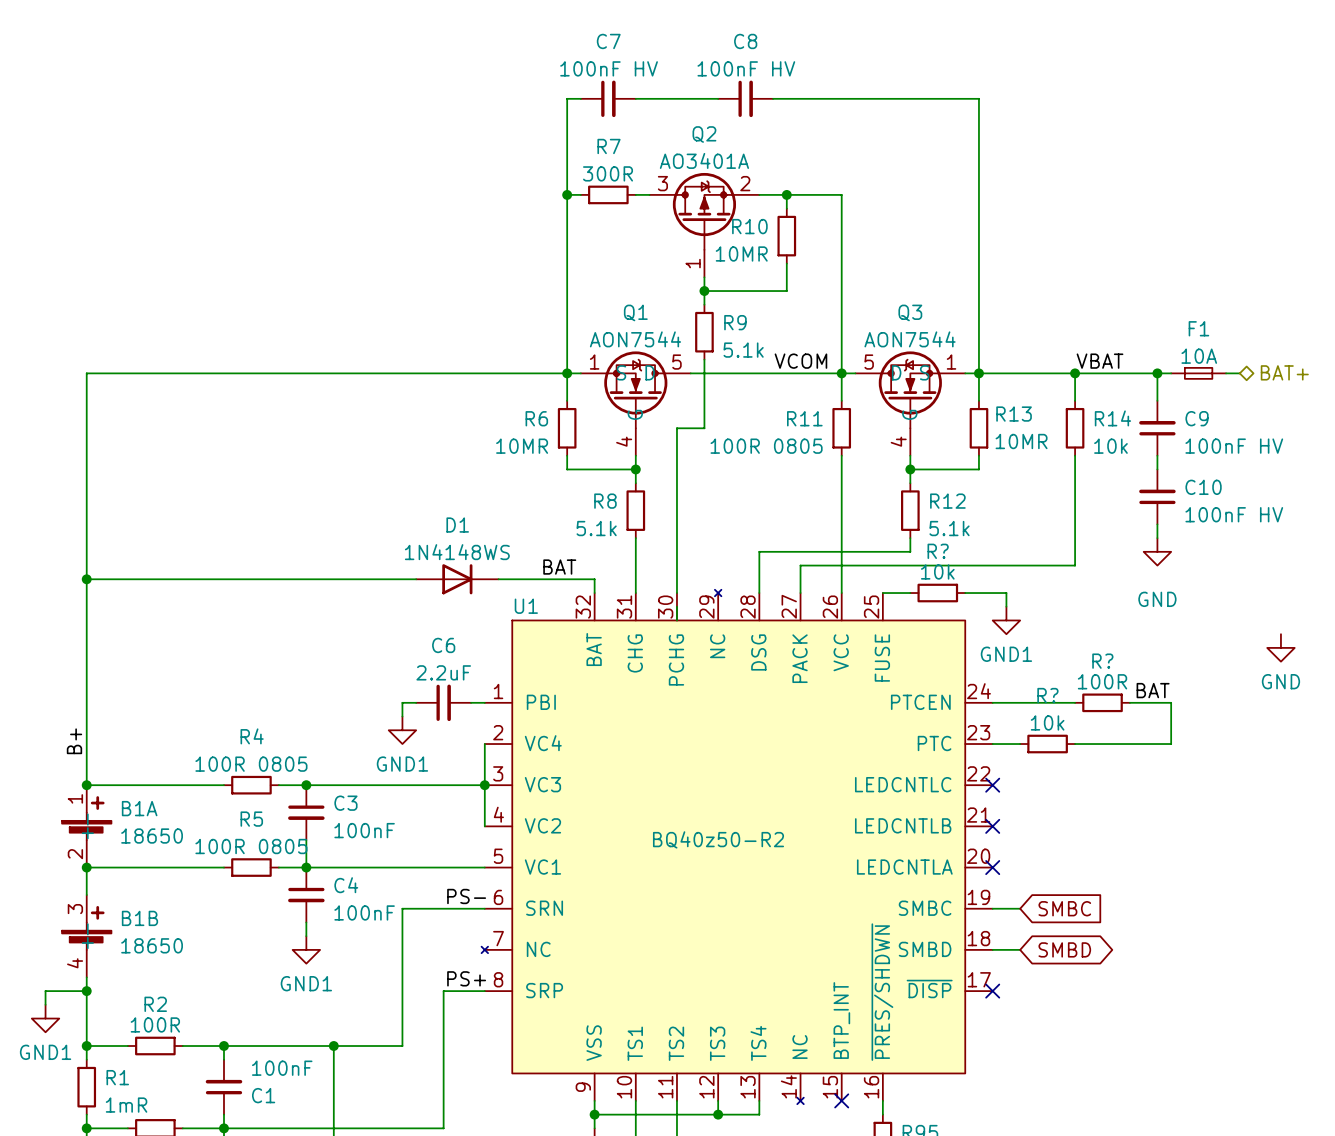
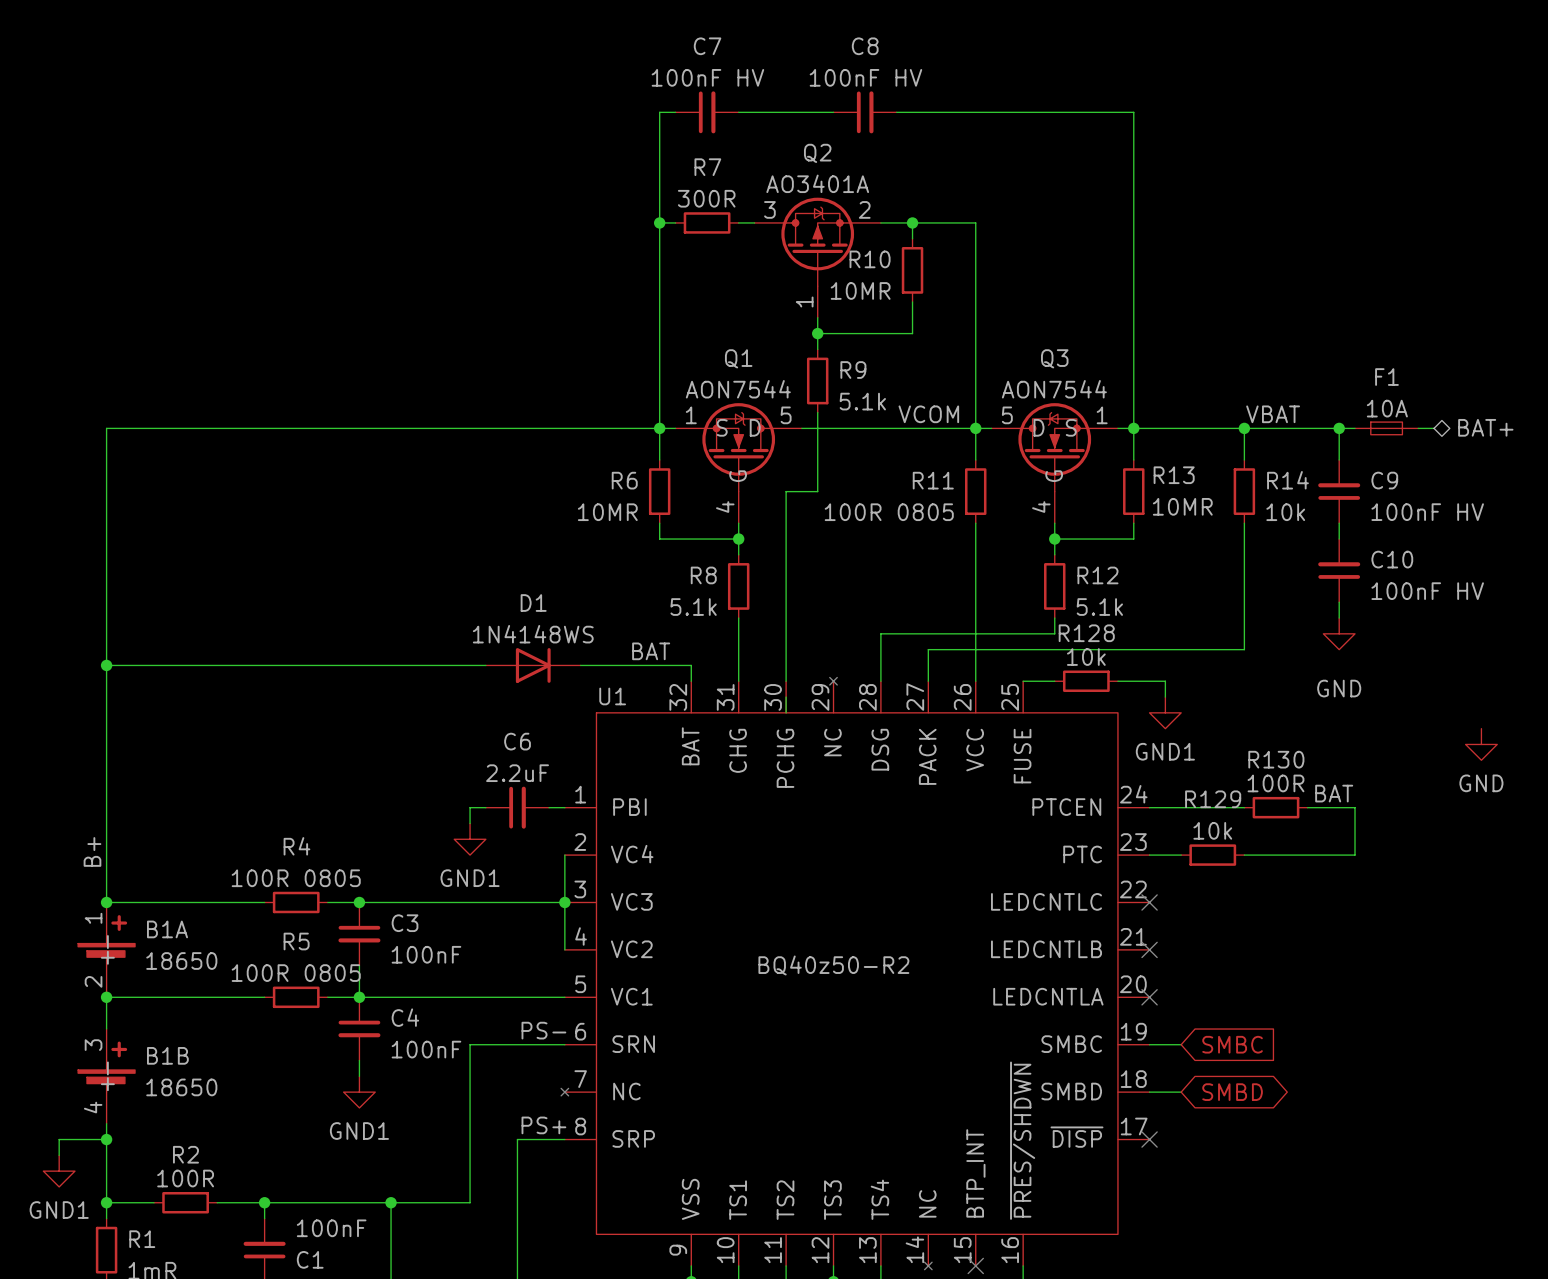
R? name: R? (938, 551) -> R128 (1086, 633)
R? name: R? (1102, 661) -> R130 (1276, 759)
R? name: R? (1047, 695) -> R129 (1213, 799)

